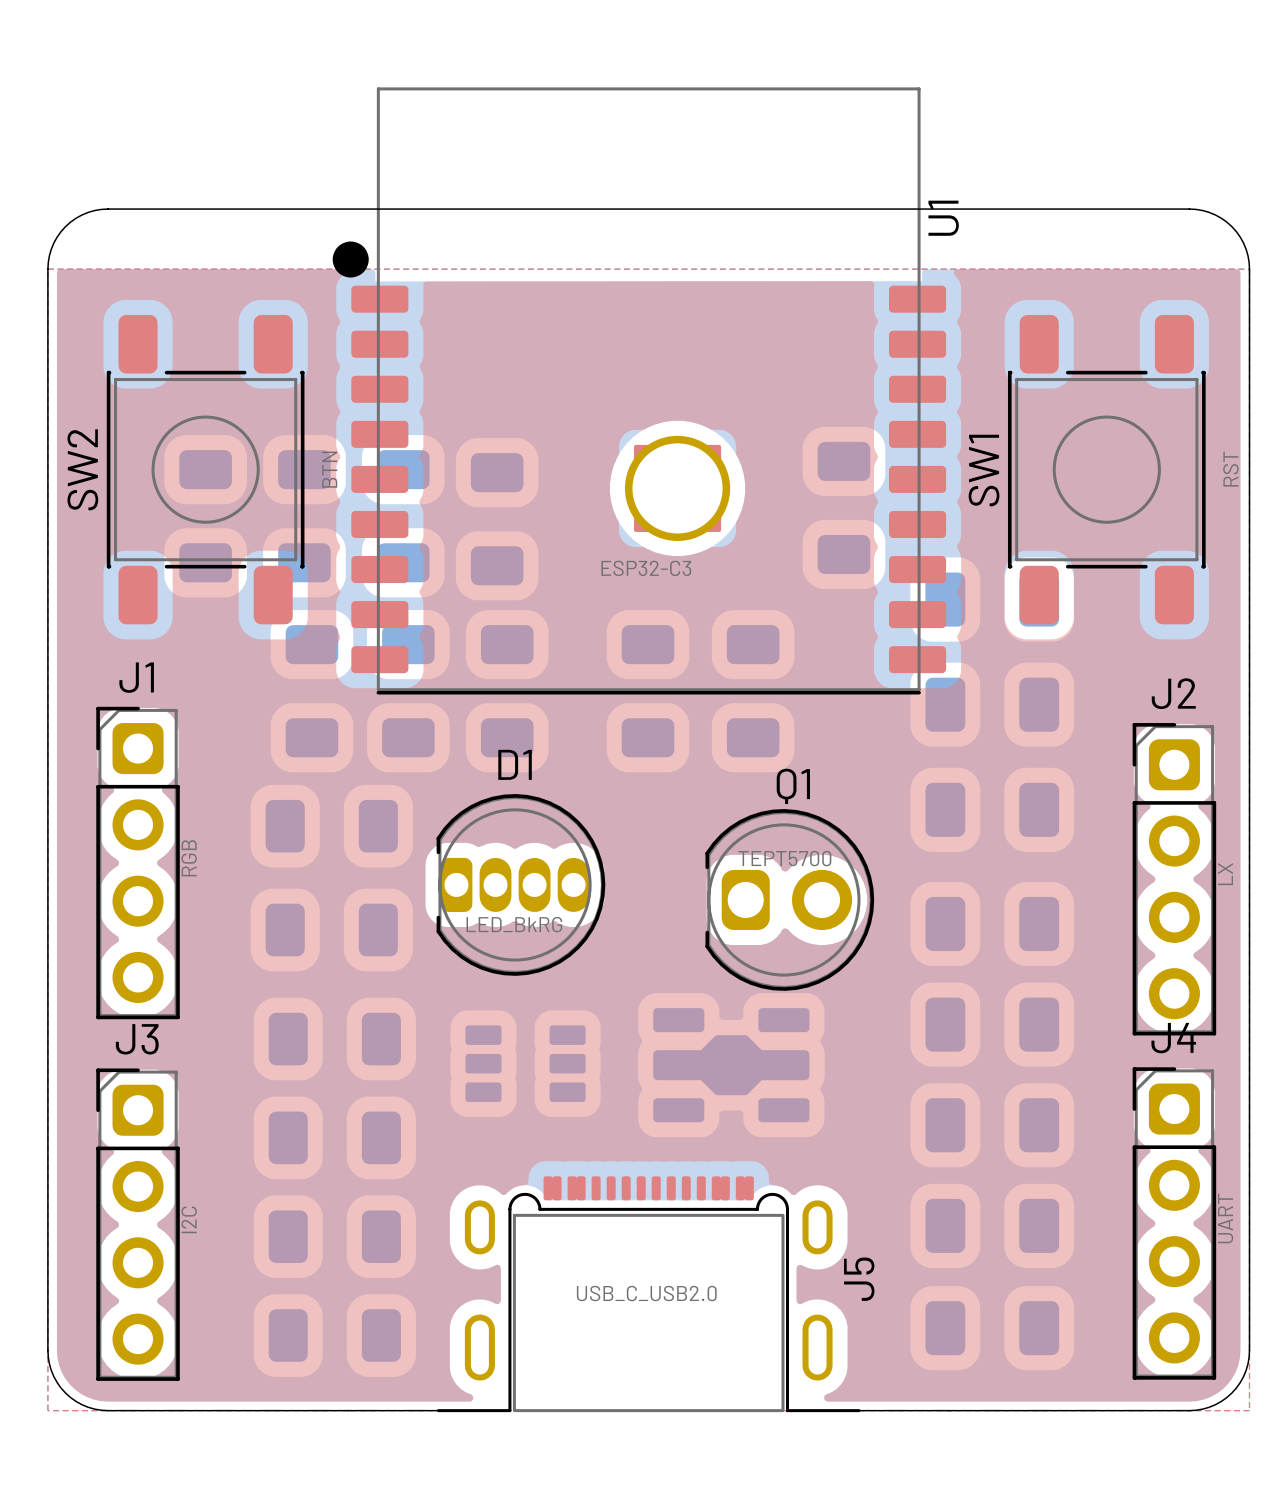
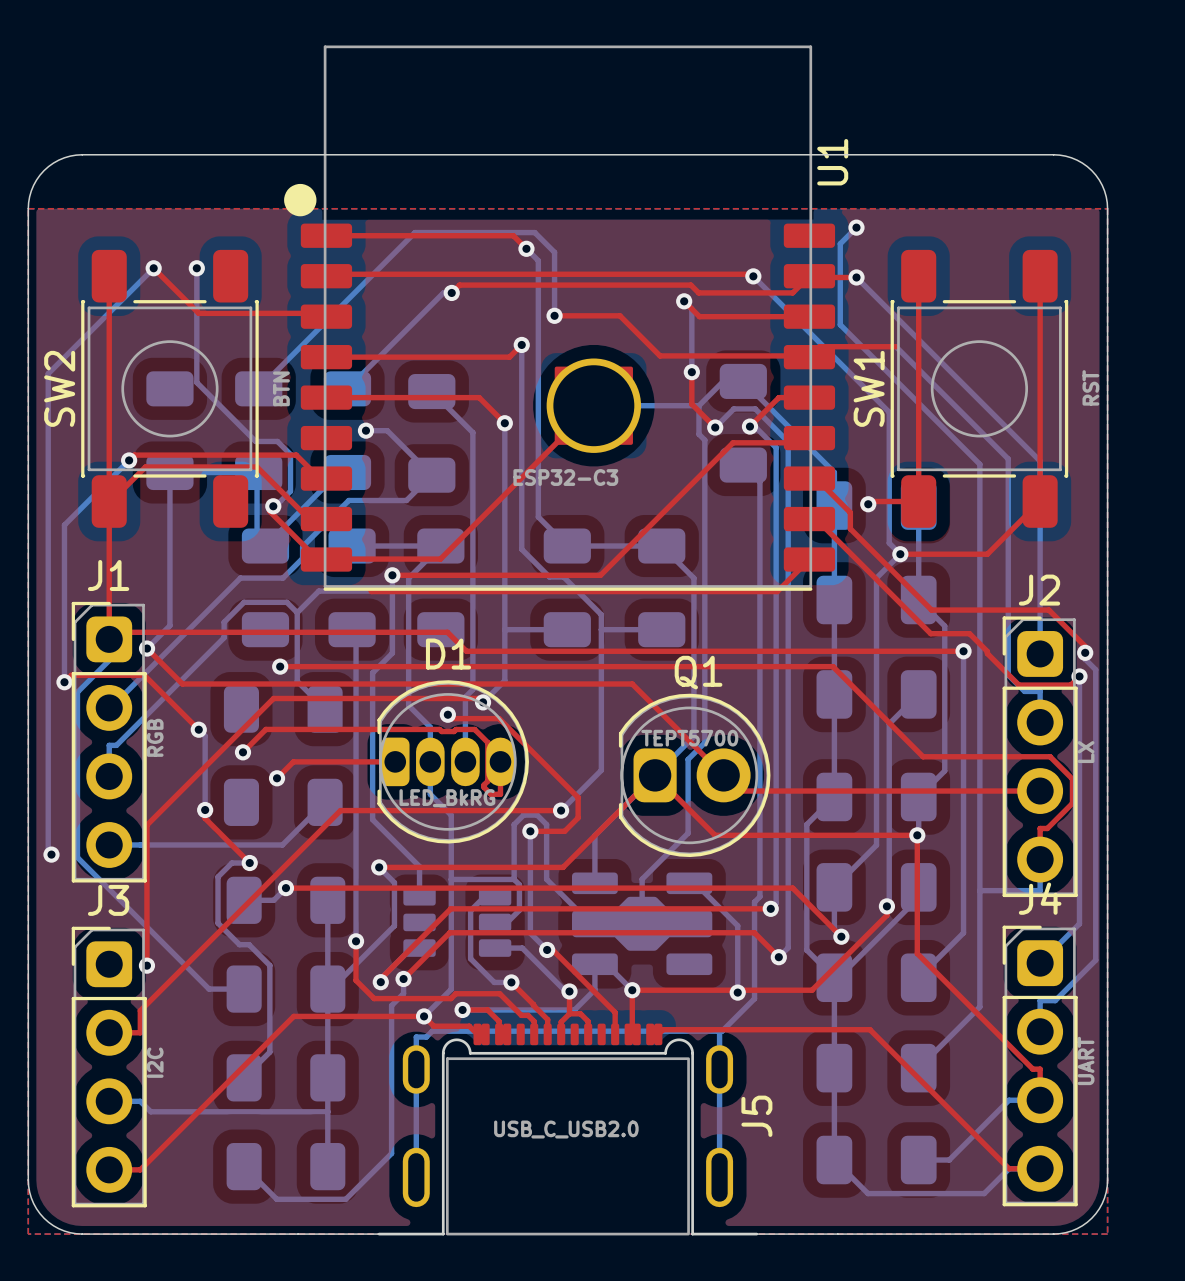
bottom track: none -> (856, 227) (840, 243) (840, 324) (979, 464) (979, 1006) (918, 1068)
via: none -> (856, 227)
top track: none -> (326, 235) (513, 235) (526, 248)
bottom track: none -> (526, 248) (538, 260) (538, 517) (567, 546) (661, 546) (693, 578) (693, 736) (594, 835) (594, 883)
via: none -> (526, 248)
top track: none -> (153, 268) (198, 313) (323, 313) (326, 316)
bottom track: none -> (153, 268) (48, 373) (48, 851) (51, 854)
via: none -> (153, 268)
bottom track: none -> (196, 268) (196, 382) (255, 441) (277, 441) (290, 454) (290, 491) (273, 506)
via: none -> (196, 268)
top track: none -> (109, 276) (109, 639) (116, 632) (447, 632) (466, 651) (963, 651)
top track: none -> (326, 276) (328, 274) (751, 274) (753, 276)
bottom track: none -> (753, 276) (889, 412) (889, 543) (900, 554) (876, 578) (876, 845) (834, 887) (834, 929) (841, 936)
via: none -> (753, 276)
top track: none -> (918, 276) (918, 501) (870, 501) (868, 504)
top track: none -> (1040, 276) (1040, 501) (987, 554) (900, 554)
top track: none -> (856, 277) (809, 276) (792, 292) (698, 292) (690, 285) (459, 285) (451, 292)
bottom track: none -> (856, 277) (1040, 461) (1040, 653)
via: none -> (856, 277)
bottom track: none -> (451, 292) (443, 292) (347, 388)
via: none -> (451, 292)
top track: none -> (684, 301) (699, 316) (809, 316)
bottom track: none -> (684, 301) (691, 309) (691, 372)
via: none -> (684, 301)
top track: none -> (554, 315) (619, 315) (660, 355) (809, 357) (819, 346) (895, 346)
bottom track: none -> (554, 315) (554, 252) (534, 232) (415, 232) (258, 388)
via: none -> (554, 315)
top track: none -> (521, 344) (509, 357) (326, 357)
bottom track: none -> (521, 344) (521, 549) (549, 576) (563, 576) (601, 614) (601, 770) (561, 810)
via: none -> (521, 344)
bottom track: none -> (895, 346) (1008, 459) (1008, 675) (1024, 691) (1040, 691) (1040, 722)
top track: none -> (691, 372) (691, 404) (715, 427)
via: none -> (691, 372)
bottom track: none -> (431, 391) (472, 432) (472, 689) (465, 697) (465, 761)
top track: none -> (326, 397) (479, 397) (504, 423)
top track: none -> (809, 397) (778, 397) (749, 426)
top track: none -> (564, 405) (623, 405) (623, 435) (564, 435) (440, 559) (317, 559) (269, 511) (273, 506)
bottom track: none -> (593, 405) (698, 405)
bottom track: none -> (698, 405) (698, 434) (704, 440) (704, 742) (688, 759) (688, 833) (642, 879) (642, 923) (591, 923) (546, 879) (546, 824) (537, 815) (523, 815) (514, 824) (514, 879)
bottom track: none -> (698, 405) (723, 381) (743, 381) (834, 472) (834, 796) (806, 824) (806, 950) (834, 977)
bottom track: none -> (504, 423) (504, 680) (483, 702)
via: none -> (504, 423)
bottom track: none -> (749, 426) (754, 426) (776, 447) (776, 903) (770, 908)
via: none -> (749, 426)
bottom track: none -> (715, 427) (733, 408) (755, 408) (788, 441) (788, 947) (778, 957)
via: none -> (715, 427)
bottom track: none -> (365, 430) (387, 430) (431, 475) (406, 500) (348, 500) (302, 546) (302, 558) (282, 578) (240, 578) (109, 707)
via: none -> (365, 430)
top track: none -> (809, 438) (804, 442) (733, 442) (600, 575) (392, 575)
top track: none -> (129, 460) (134, 455) (296, 455) (319, 478) (326, 478)
bottom track: none -> (129, 460) (64, 525) (64, 682)
via: none -> (129, 460)
bottom track: none -> (743, 465) (759, 481) (759, 896) (754, 902) (754, 998) (722, 1031) (432, 1031) (426, 1037) (416, 1037) (416, 1177)
bottom track: none -> (347, 472) (338, 472) (265, 546) (257, 537) (257, 474) (258, 472) (169, 472) (169, 625) (147, 648)
top track: none -> (809, 478) (816, 478) (850, 512) (850, 528) (931, 610) (1048, 610) (1085, 646) (1085, 652)
top track: none -> (109, 501) (145, 467) (256, 467) (309, 519) (326, 519)
via: none -> (868, 504)
bottom track: none -> (918, 505) (918, 599) (944, 626) (944, 770) (918, 796) (917, 835)
via: none -> (273, 506)
top track: none -> (809, 519) (816, 519) (930, 633) (969, 633) (1018, 685) (1070, 685) (1079, 676)
bottom track: none -> (352, 546) (440, 546) (408, 578) (408, 705) (430, 727) (430, 794) (451, 815) (451, 989) (424, 1016)
via: none -> (900, 554)
top track: none -> (809, 559) (777, 591) (371, 591)
bottom track: none -> (392, 575) (392, 653) (372, 672) (372, 819) (419, 866) (419, 896)
via: none -> (392, 575)
bottom track: none -> (371, 591) (318, 591) (297, 612)
bottom track: none -> (297, 612) (297, 681) (325, 709)
bottom track: none -> (297, 612) (286, 602) (244, 602) (224, 622) (224, 637) (116, 745) (109, 745) (109, 776)
bottom track: none -> (352, 629) (356, 633) (356, 941)
bottom track: none -> (504, 629) (567, 629)
bottom track: none -> (601, 629) (661, 629)
bottom track: none -> (109, 639) (109, 660) (77, 692) (77, 857) (209, 989) (244, 989)
top track: none -> (147, 648) (182, 684) (632, 684) (739, 791) (1040, 791)
via: none -> (147, 648)
bottom track: none -> (963, 651) (963, 932) (918, 977)
via: none -> (963, 651)
bottom track: none -> (1085, 652) (1085, 659) (1095, 669) (1095, 960) (1055, 1000) (1040, 1000) (1040, 1031)
via: none -> (1085, 652)
top track: none -> (280, 666) (832, 666) (923, 756) (1050, 756) (1072, 779) (1072, 803) (1047, 828) (1040, 828) (1040, 859)
via: none -> (280, 666)
bottom track: none -> (1079, 676) (1079, 923) (1040, 963)
via: none -> (1079, 676)
top track: none -> (64, 682) (71, 675) (144, 675) (198, 729)
via: none -> (64, 682)
bottom track: none -> (918, 694) (889, 723) (889, 904) (886, 906)
top track: none -> (483, 702) (479, 698) (273, 698) (146, 825) (146, 965)
via: none -> (483, 702)
top track: none -> (447, 714) (451, 718) (499, 718) (578, 797) (578, 817) (564, 831) (530, 831)
via: none -> (447, 714)
bottom track: none -> (198, 729) (205, 736) (205, 810)
via: none -> (198, 729)
top track: none -> (242, 752) (265, 729) (439, 729) (441, 731) (474, 729) (487, 742) (487, 781) (483, 787) (490, 794) (500, 794) (500, 761)
via: none -> (242, 752)
top track: none -> (395, 761) (293, 761) (277, 778)
via: none -> (277, 778)
bottom track: none -> (325, 802) (282, 844) (109, 844)
top track: none -> (205, 810) (205, 818) (249, 863)
via: none -> (205, 810)
top track: none -> (561, 810) (340, 810) (140, 1010) (140, 1032) (109, 1032)
via: none -> (561, 810)
bottom track: none -> (530, 831) (530, 933) (547, 949)
via: none -> (530, 831)
via: none -> (917, 835)
via: none -> (51, 854)
bottom track: none -> (1040, 859) (1040, 890) (979, 890)
bottom track: none -> (249, 863) (231, 863) (218, 876) (218, 923) (239, 944) (249, 944) (269, 965) (269, 1052) (244, 1077)
via: none -> (249, 863)
top track: none -> (379, 867) (563, 867) (655, 775) (715, 835) (917, 835) (917, 953) (1032, 1069) (1040, 1069) (1040, 1100)
bottom track: none -> (379, 867) (394, 882) (394, 925) (331, 989) (327, 989)
via: none -> (379, 867)
bottom track: none -> (451, 879) (514, 879)
bottom track: none -> (514, 879) (519, 884) (519, 910) (507, 922) (495, 922)
bottom track: none -> (689, 883) (695, 883) (737, 925) (737, 992)
bottom track: none -> (918, 887) (918, 897) (838, 977) (834, 977)
top track: none -> (285, 888) (792, 888) (841, 936)
bottom track: none -> (285, 888) (273, 900) (244, 900)
via: none -> (285, 888)
bottom track: none -> (495, 896) (484, 896) (470, 910) (470, 958) (494, 982) (511, 982)
bottom track: none -> (327, 900) (327, 1166)
top track: none -> (886, 906) (886, 915) (812, 990) (632, 990) (632, 1030) (628, 1034) (636, 1034)
via: none -> (886, 906)
top track: none -> (770, 908) (450, 908) (380, 978) (380, 982)
via: none -> (770, 908)
via: none -> (841, 936)
top track: none -> (356, 941) (356, 980) (374, 998) (451, 998) (455, 993) (499, 993) (521, 1015) (528, 1015) (534, 1021) (534, 1034)
via: none -> (356, 941)
bottom track: none -> (495, 948) (522, 948) (565, 991) (569, 991)
top track: none -> (547, 949) (552, 949) (615, 1012) (615, 1034)
via: none -> (547, 949)
top track: none -> (778, 957) (754, 932) (449, 932) (403, 978)
via: none -> (778, 957)
via: none -> (146, 965)
bottom track: none -> (834, 977) (834, 1160) (867, 1193) (984, 1193) (1009, 1168) (1040, 1168)
bottom track: none -> (403, 978) (403, 993) (391, 1005) (391, 1153) (345, 1199) (276, 1199) (244, 1166)
via: none -> (403, 978)
via: none -> (380, 982)
top track: none -> (511, 982) (547, 1019) (547, 1034)
via: none -> (511, 982)
bottom track: none -> (632, 990) (606, 964) (594, 964) (594, 989) (574, 1009) (462, 1009)
via: none -> (632, 990)
top track: none -> (569, 991) (569, 1013)
via: none -> (569, 991)
via: none -> (737, 992)
top track: none -> (462, 1009) (487, 1009) (499, 1021) (499, 1034) (507, 1034)
via: none -> (462, 1009)
top track: none -> (569, 1013) (580, 1013) (588, 1021) (588, 1034)
top track: none -> (569, 1013) (561, 1022) (561, 1034)
via: none -> (424, 1016)
bottom track: none -> (719, 1031) (719, 1177)
top track: none -> (485, 1034) (477, 1034) (469, 1026) (433, 1026) (424, 1016) (293, 1016) (140, 1169) (109, 1169)
top track: none -> (650, 1034) (658, 1034) (663, 1029) (869, 1029) (1009, 1168) (1040, 1168)
bottom track: none -> (1040, 1100) (1009, 1100) (949, 1160) (918, 1160)
bottom track: none -> (109, 1101) (140, 1101) (150, 1111) (327, 1111)

